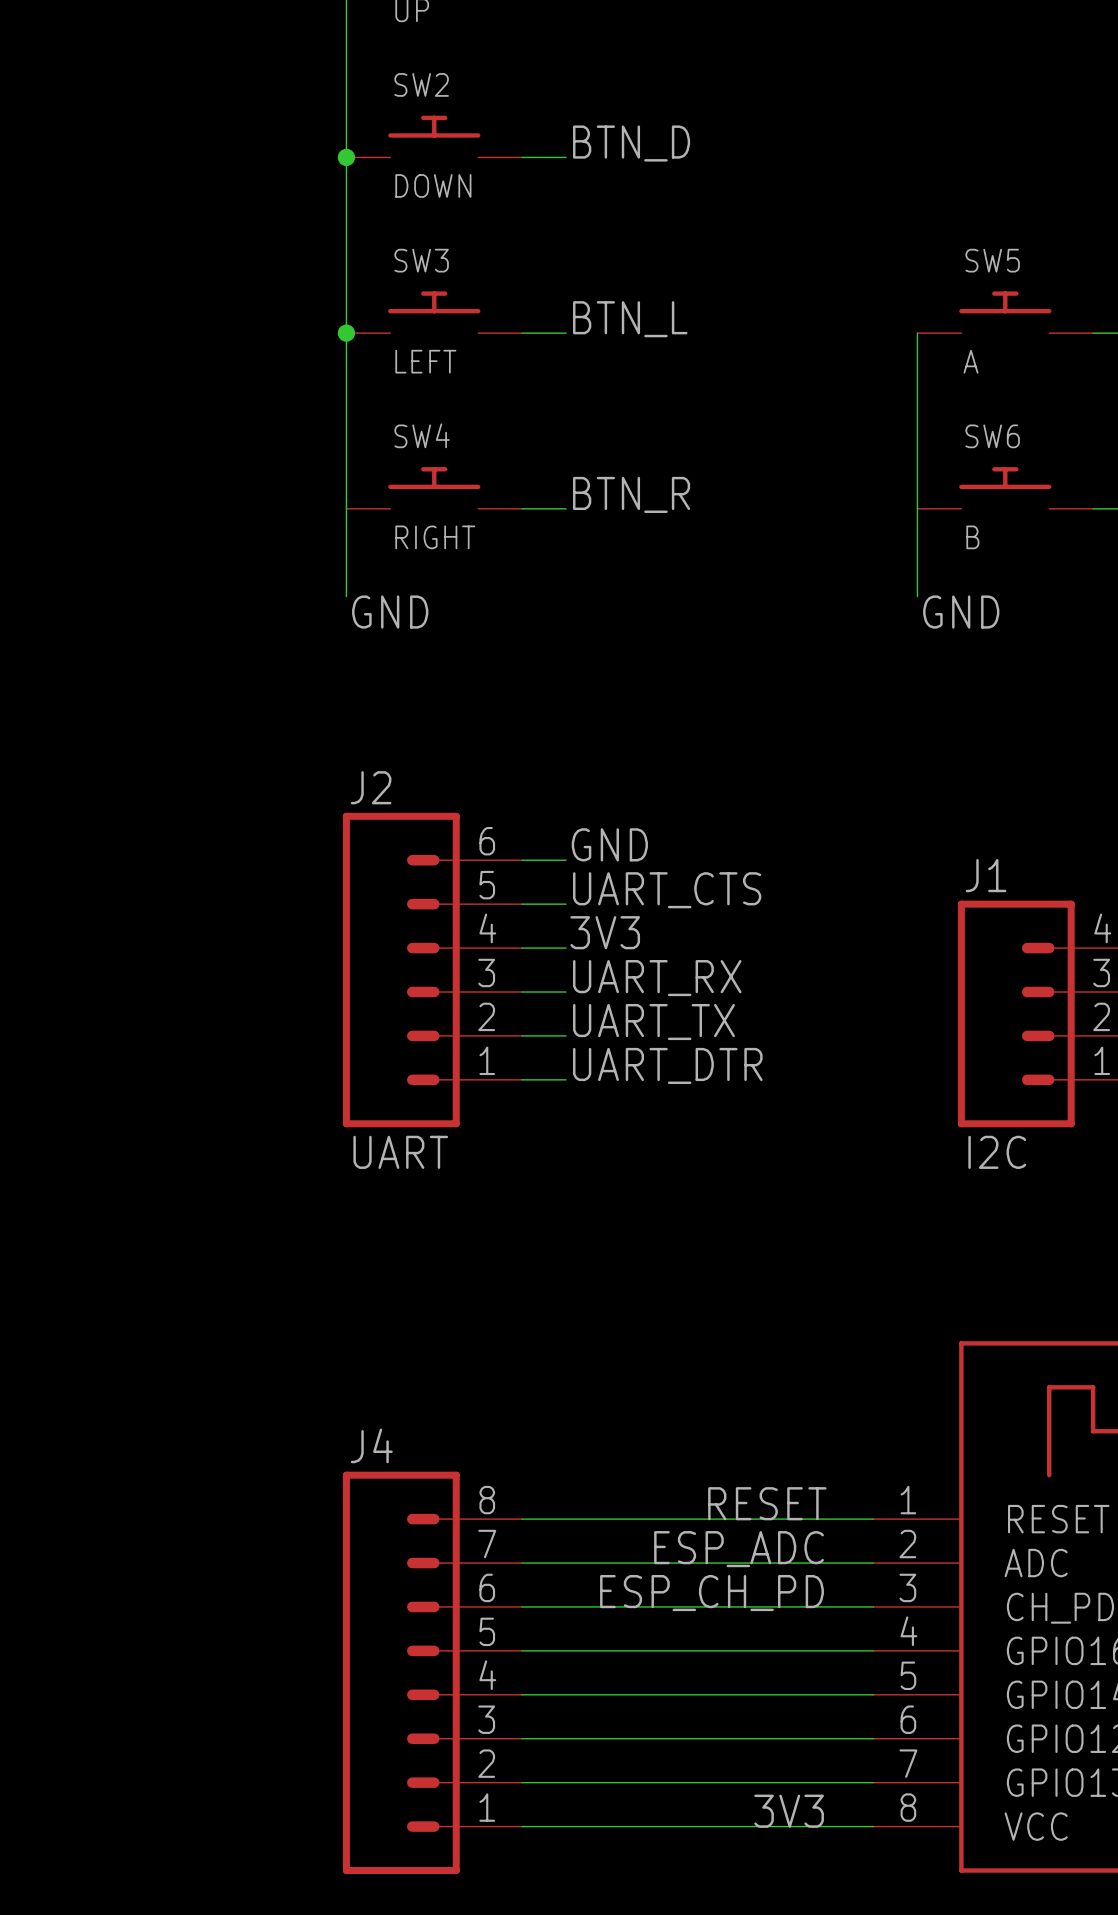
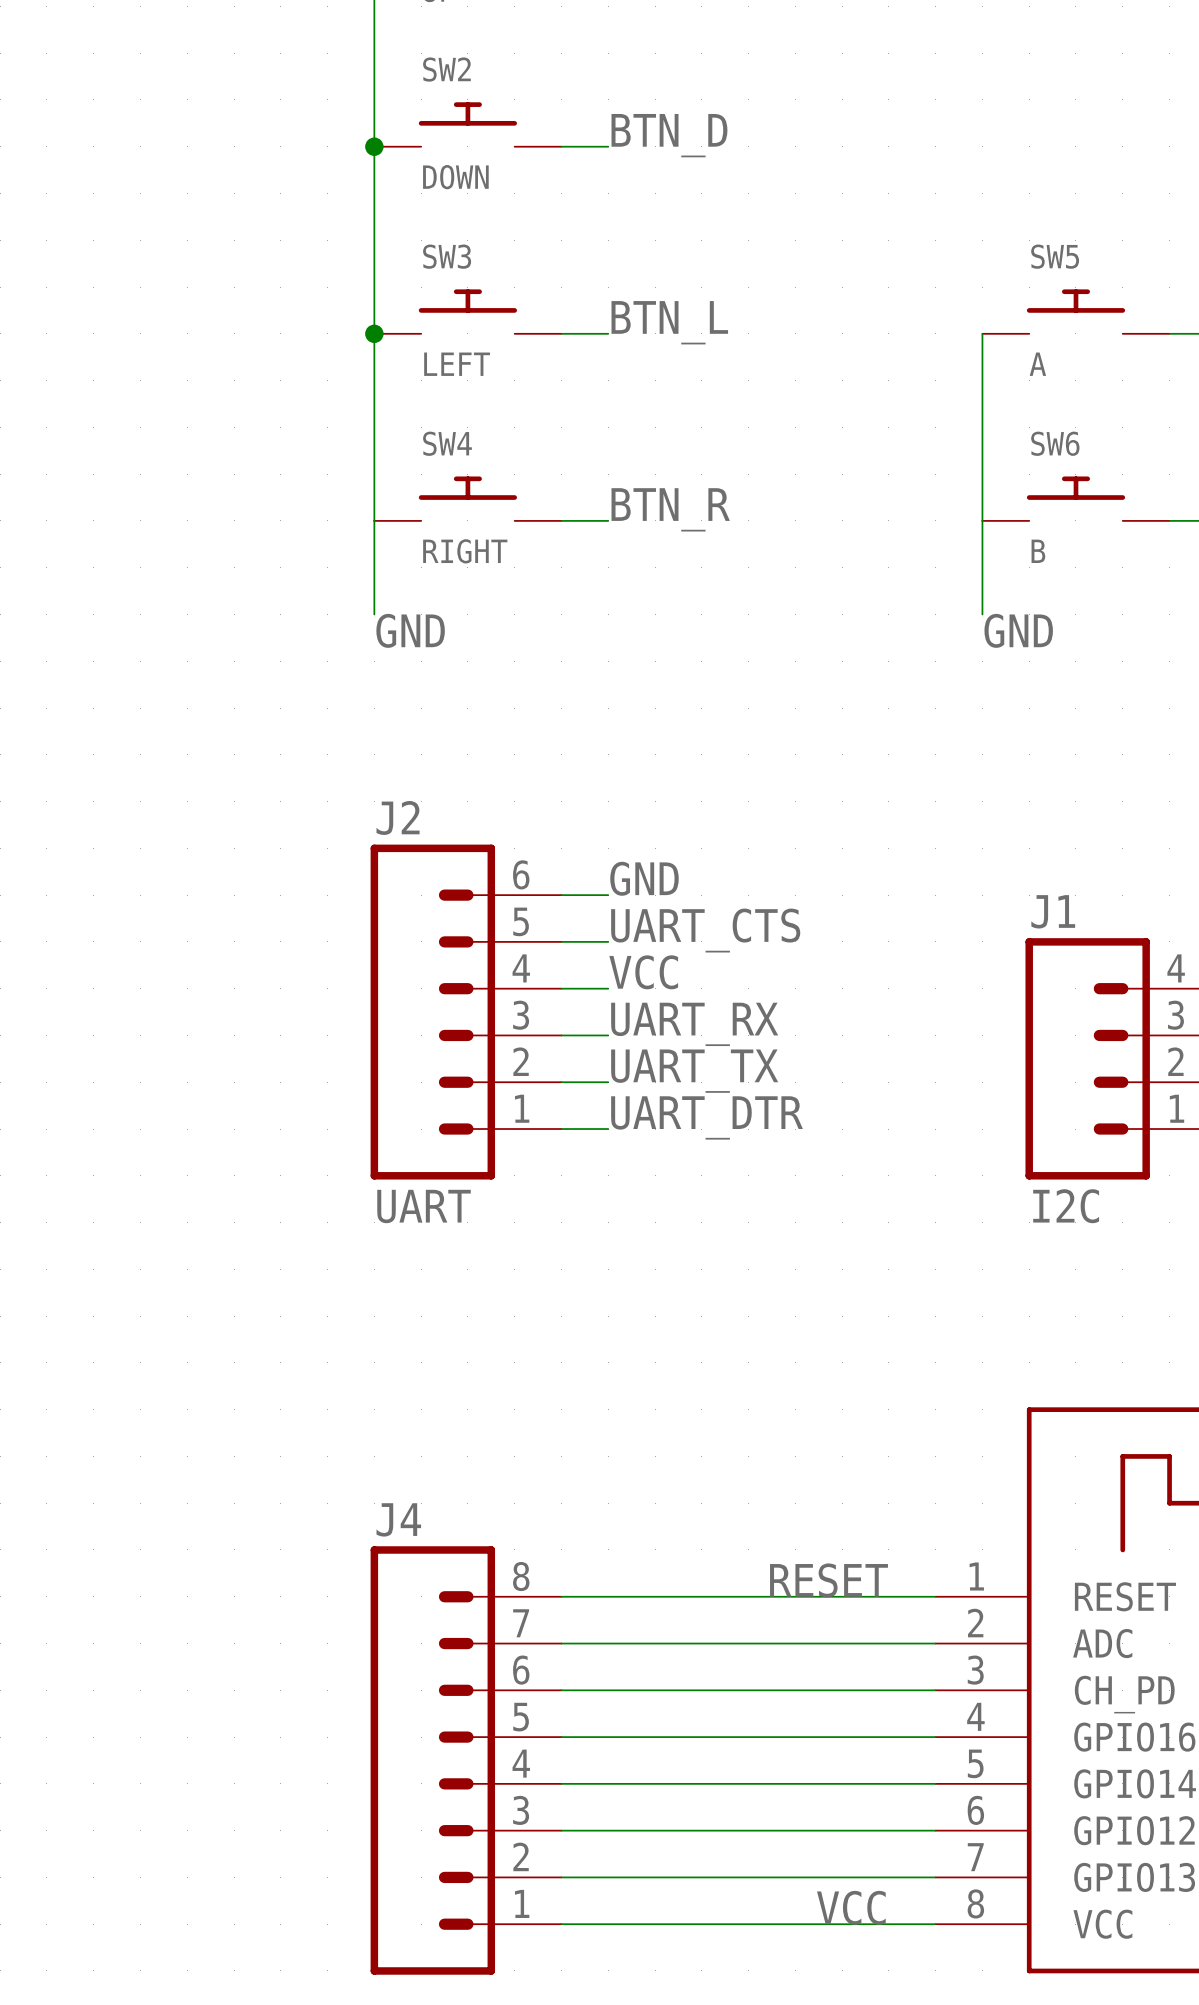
label: 3V3 (605, 932) -> VCC (643, 972)
label: ESP_ADC (739, 1549) -> none
label: ESP_CH_PD (712, 1593) -> none
label: 3V3 (789, 1811) -> VCC (851, 1907)

